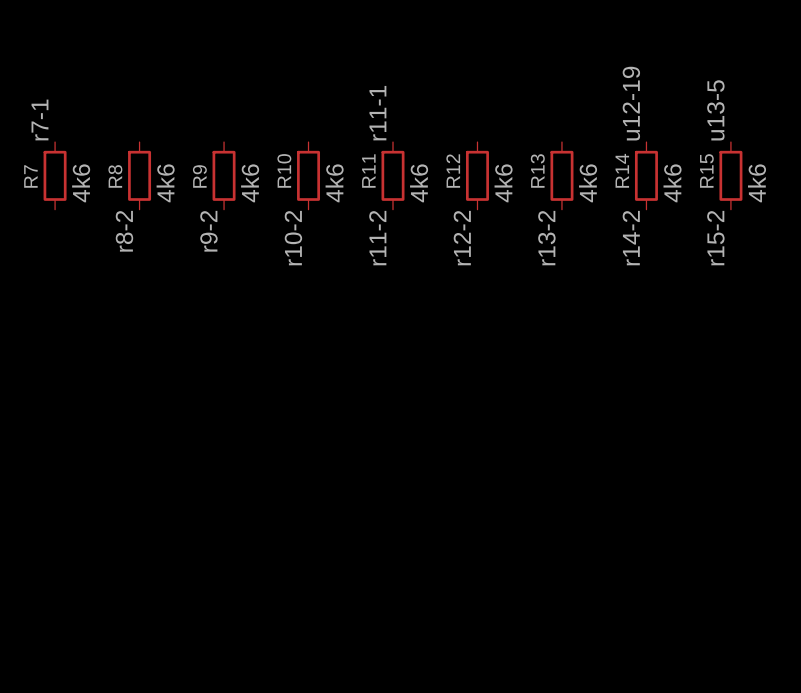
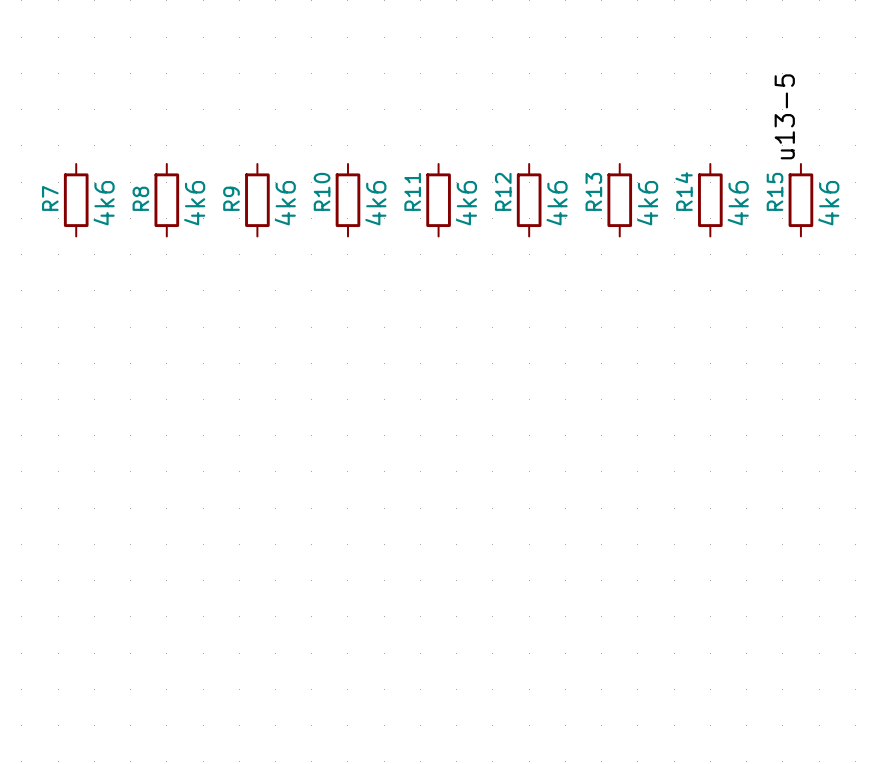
label: u12-19 (631, 103) -> none
label: r11-1 (377, 113) -> none
label: r7-1 (39, 120) -> none
label: r8-2 (124, 231) -> none
label: r9-2 (208, 231) -> none
label: r10-2 (293, 238) -> none
label: r11-2 (377, 238) -> none
label: r12-2 (462, 238) -> none
label: r13-2 (546, 238) -> none
label: r14-2 (631, 238) -> none
label: r15-2 (715, 238) -> none

